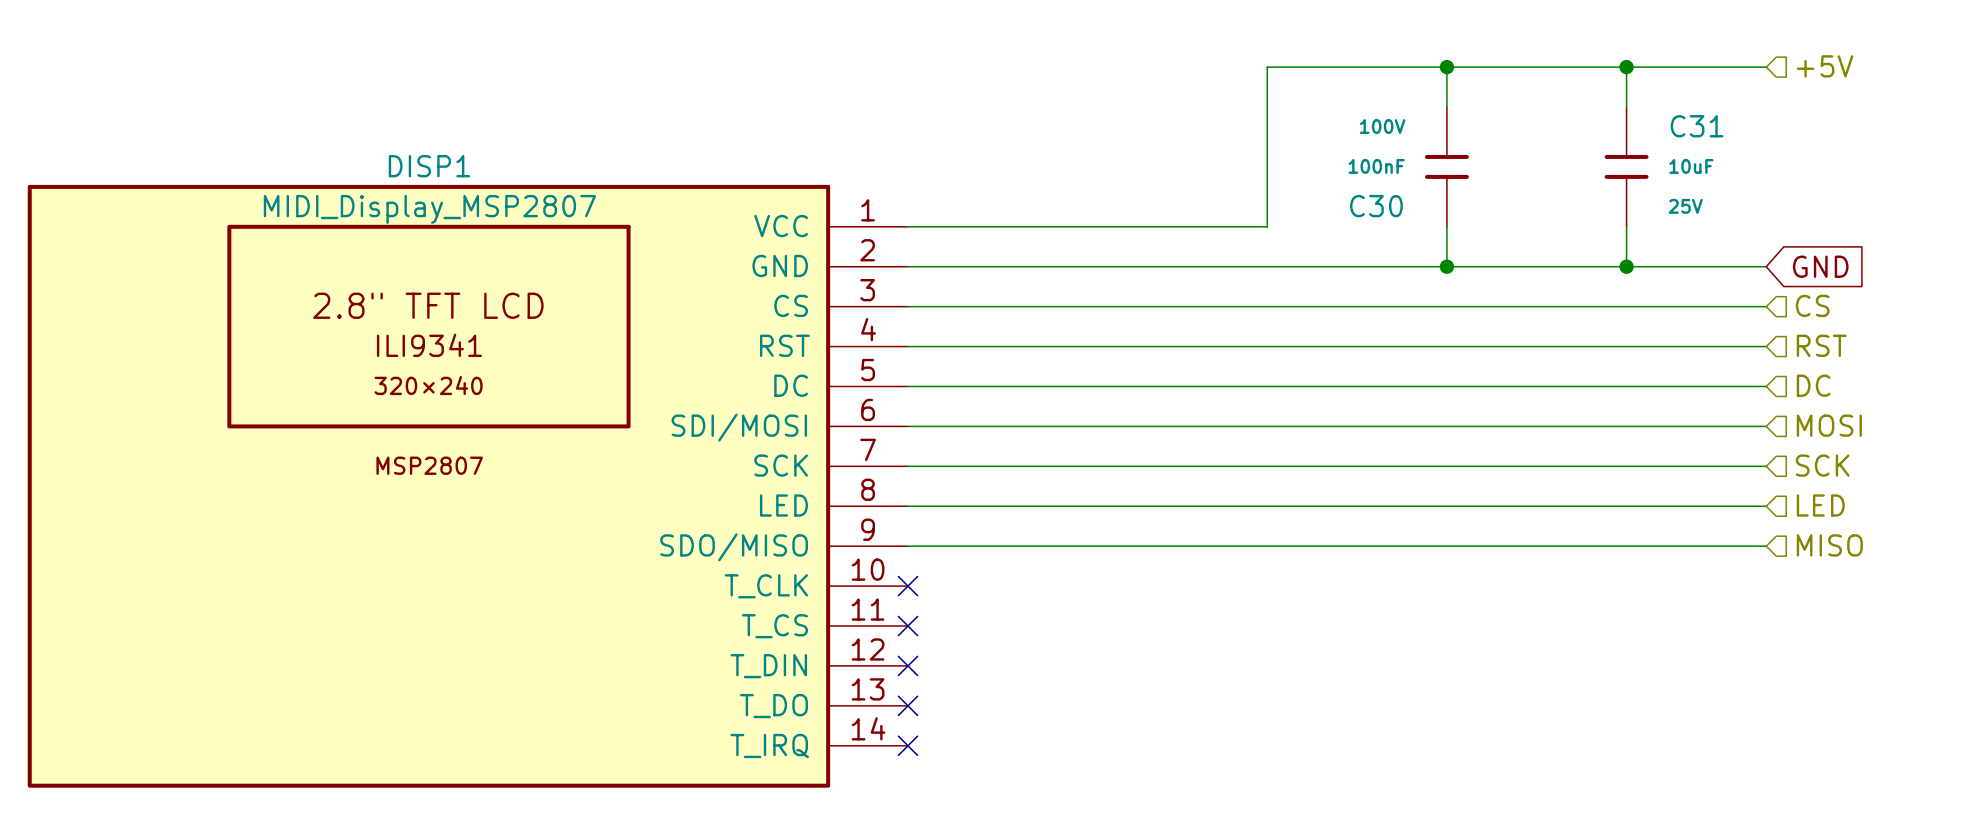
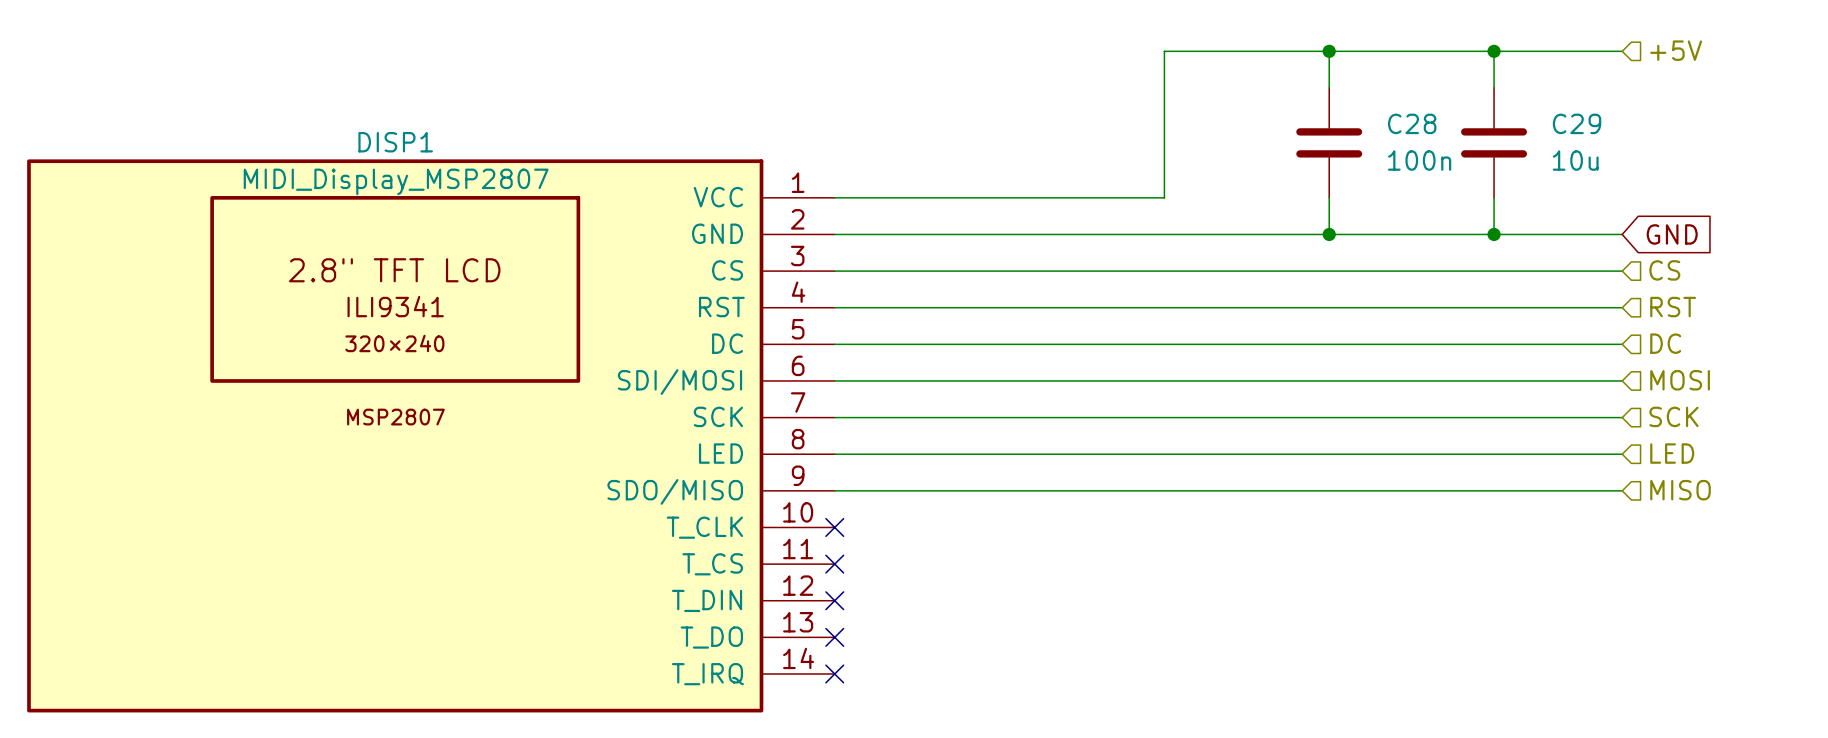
C30: 100nF (1446, 166) -> none
C28: none -> 100n (1329, 142)
C31: 10uF (1626, 166) -> none
C29: none -> 10u (1494, 142)

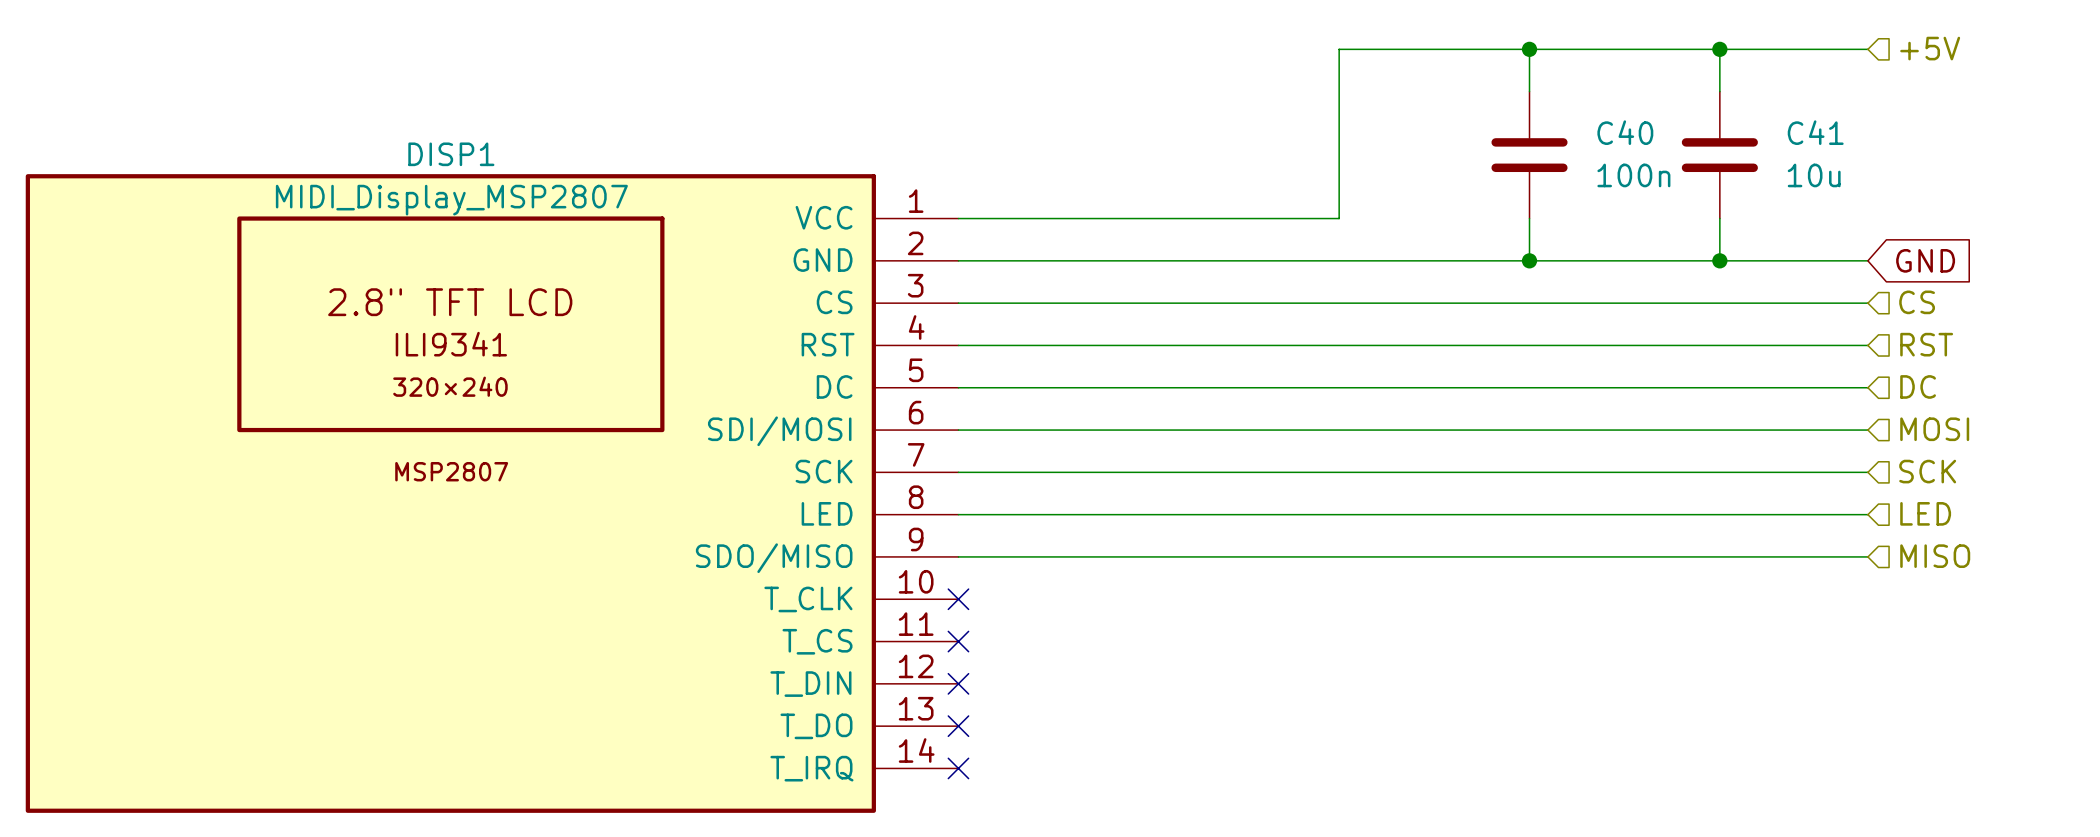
C28 name: C28 (1412, 123) -> C40 (1625, 132)
C29 name: C29 (1577, 123) -> C41 (1815, 132)

